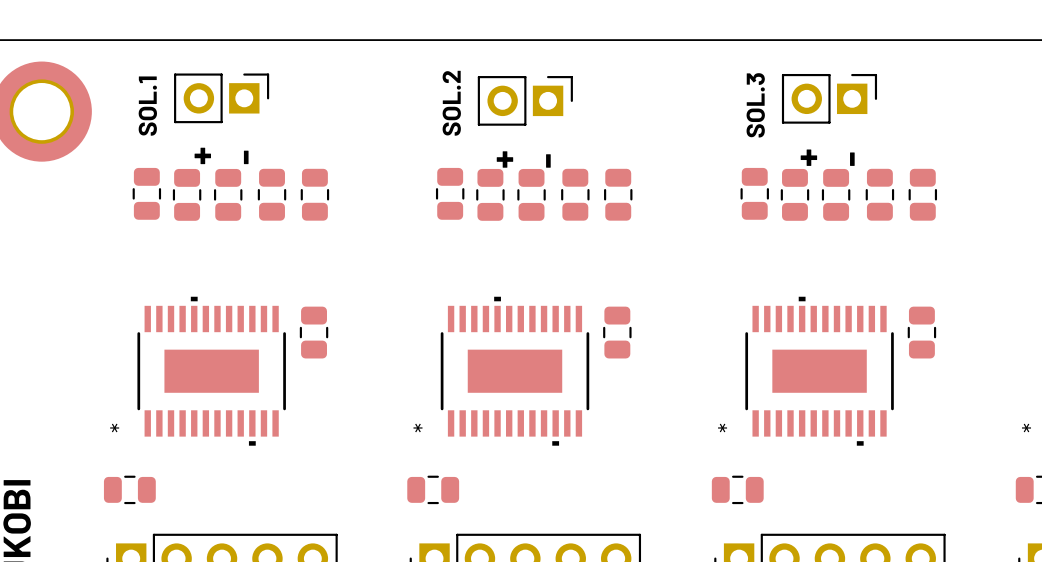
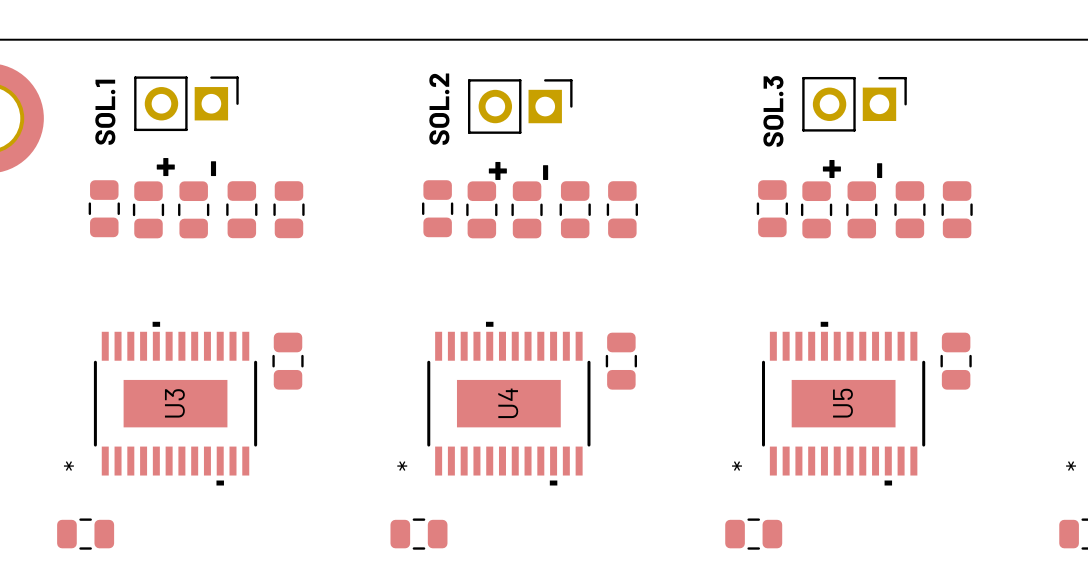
U3 name: none -> U3 (174, 403)
U4 name: none -> U4 (508, 403)
U5 name: none -> U5 (842, 403)

